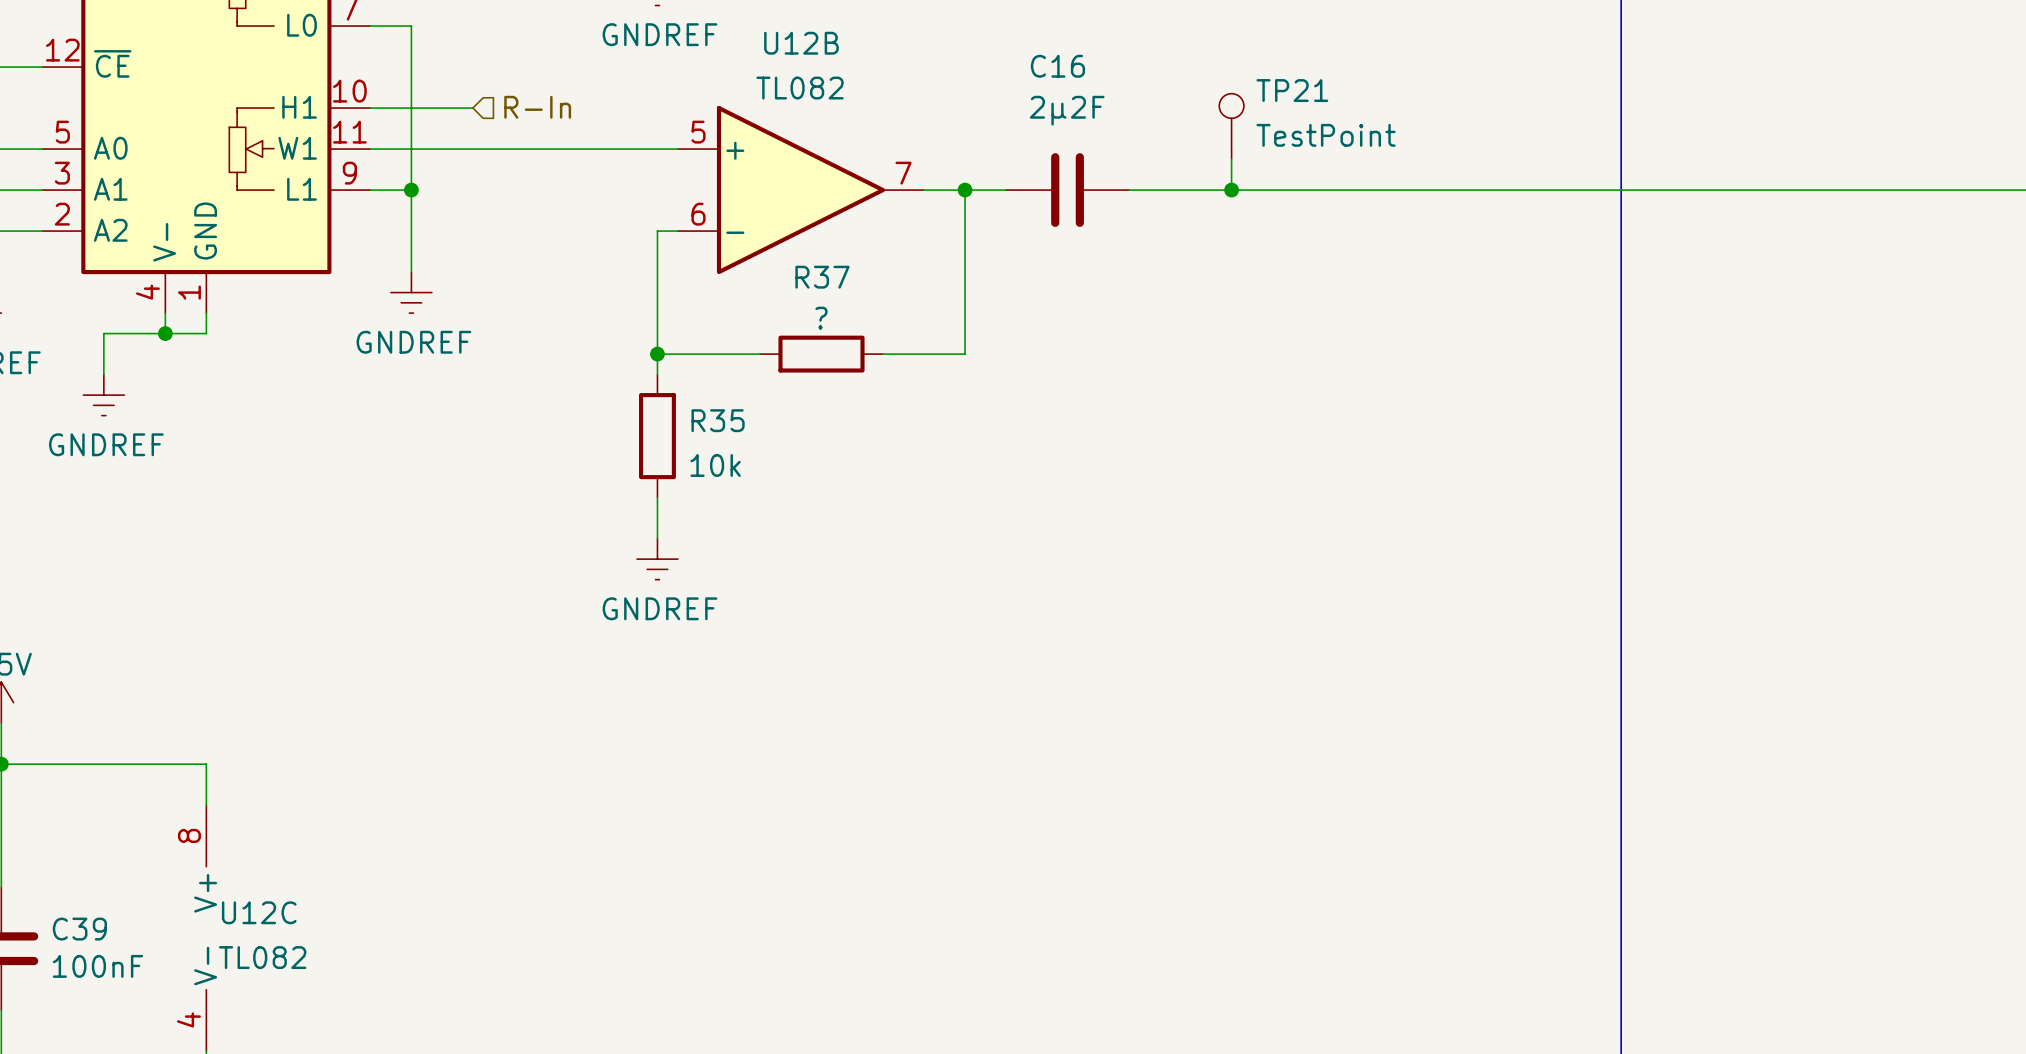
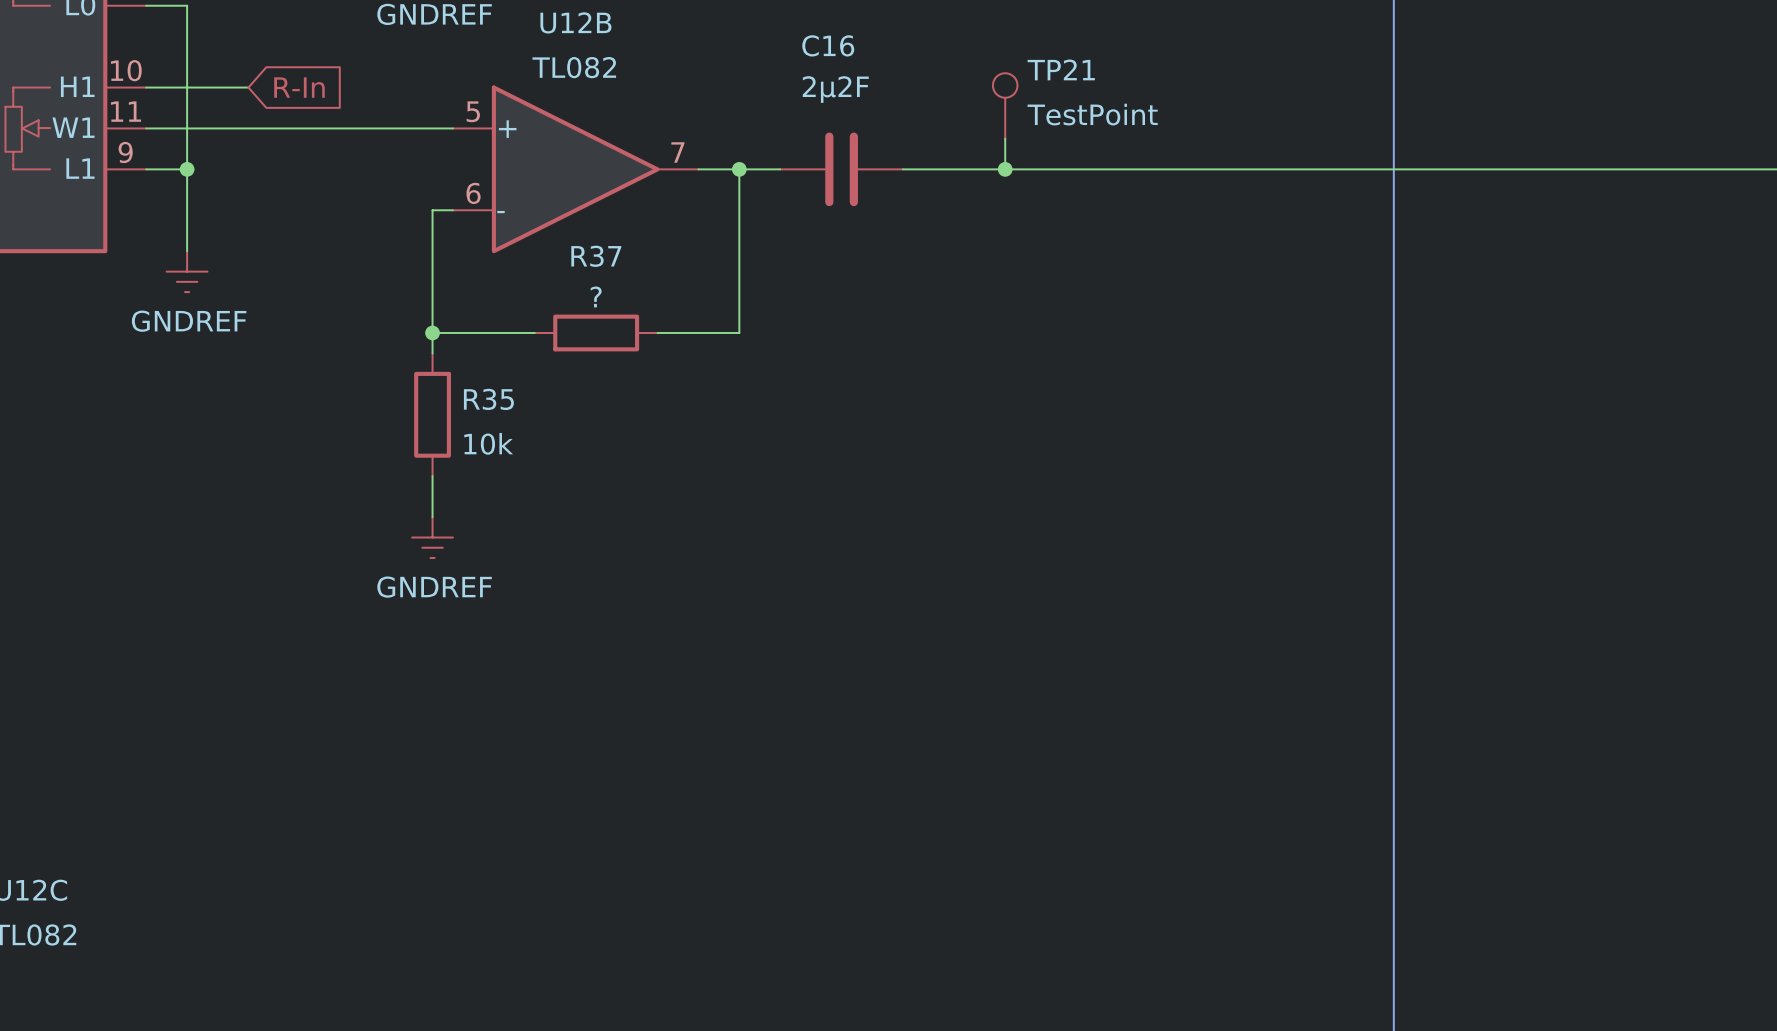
hierarchical label: R-In (537, 107) -> none
global label: none -> R-In (299, 87)

